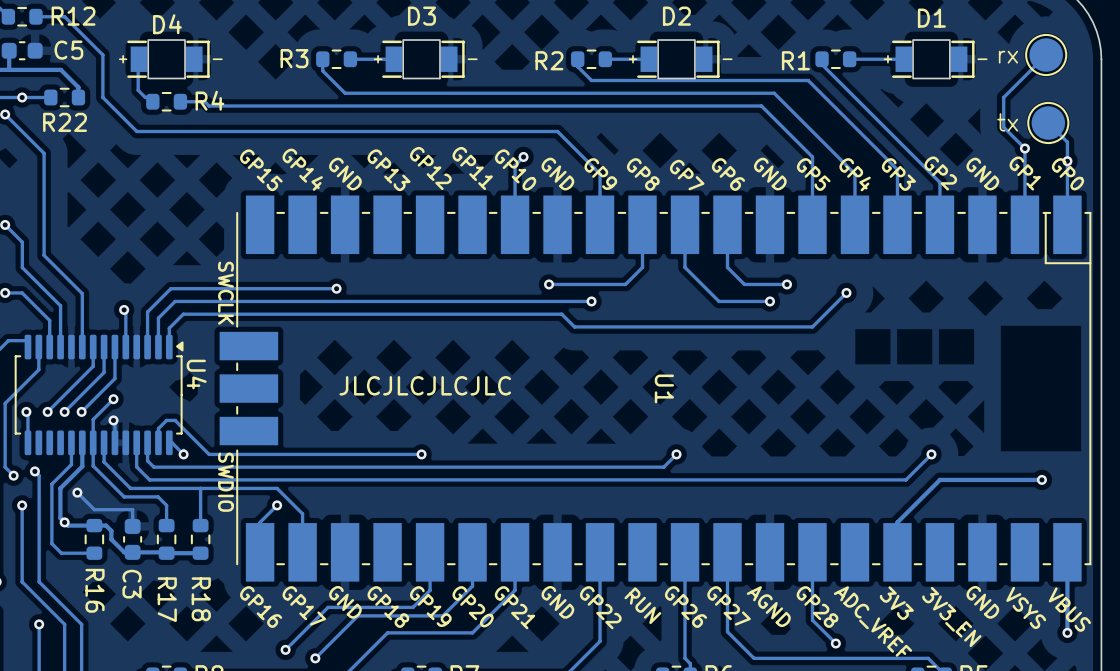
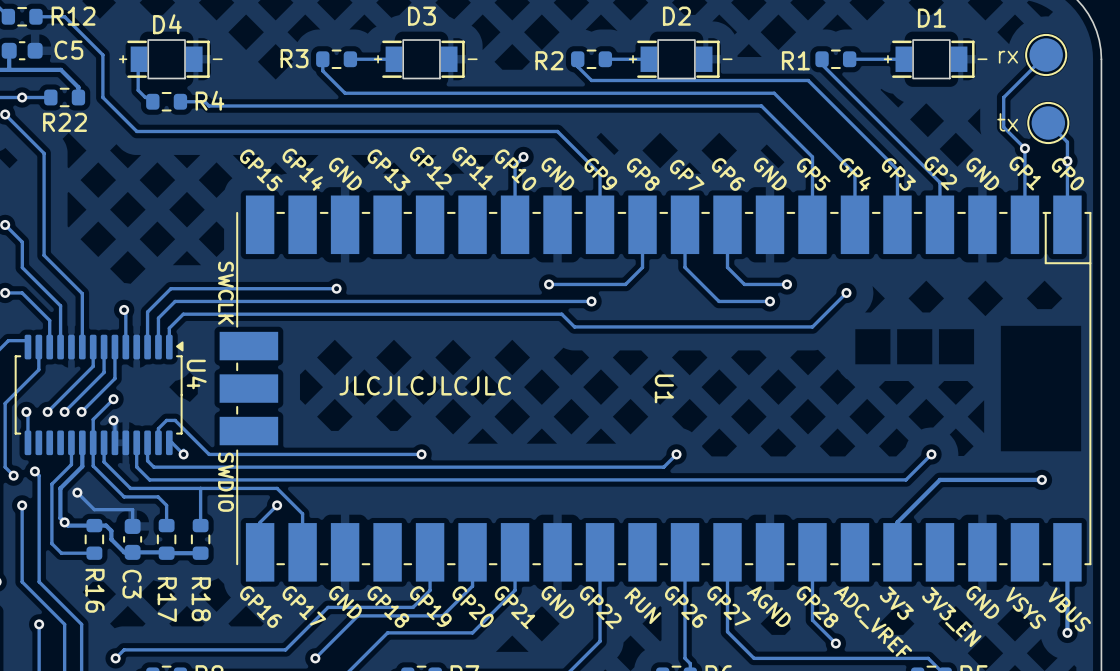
track: none -> (285, 649) (124, 649) (115, 658)
via: (285, 649) -> none
via: none -> (115, 658)

